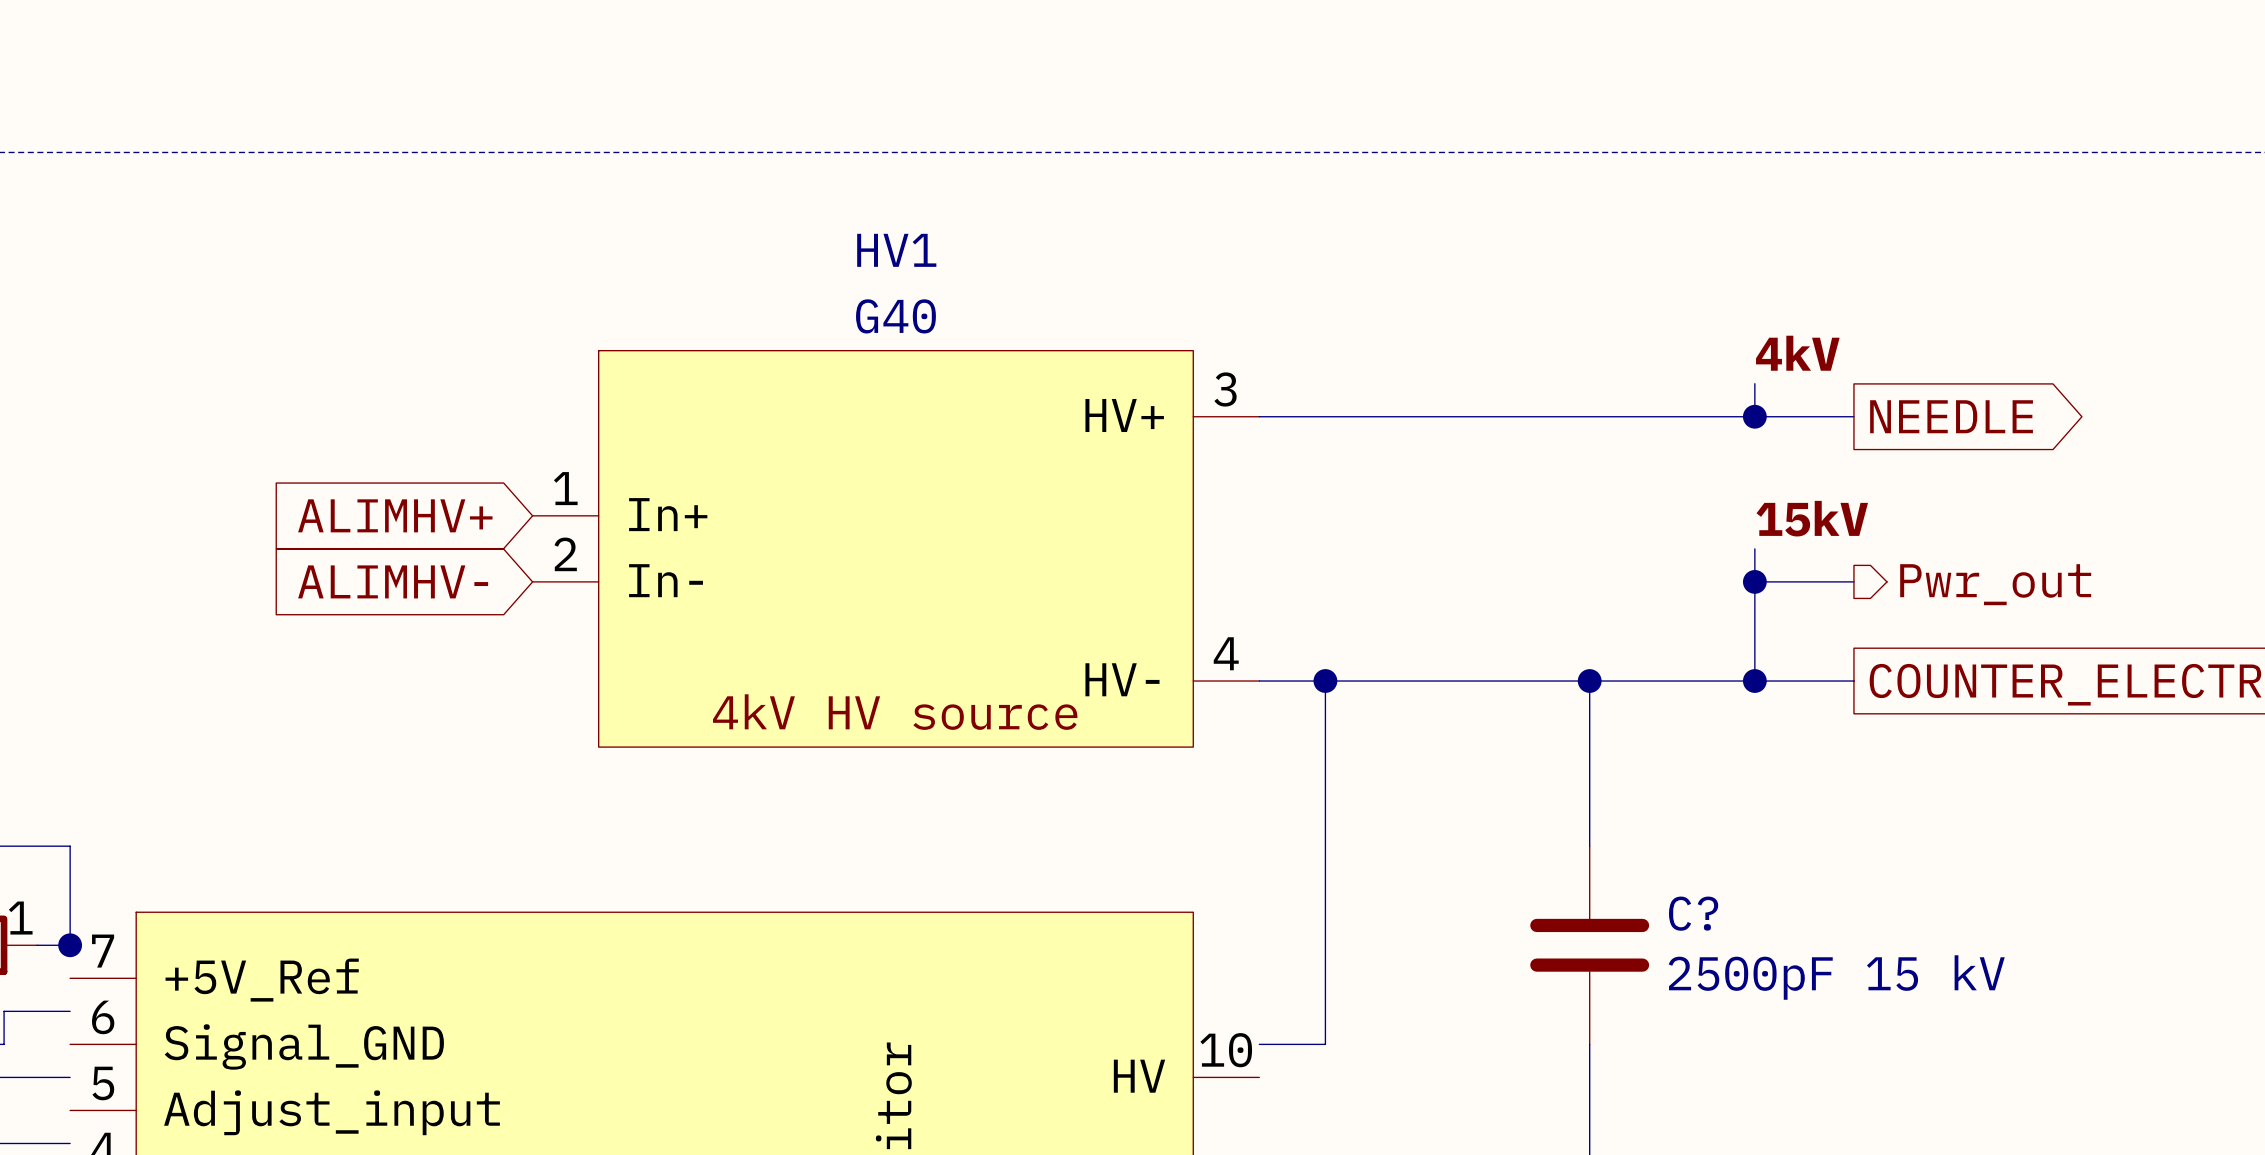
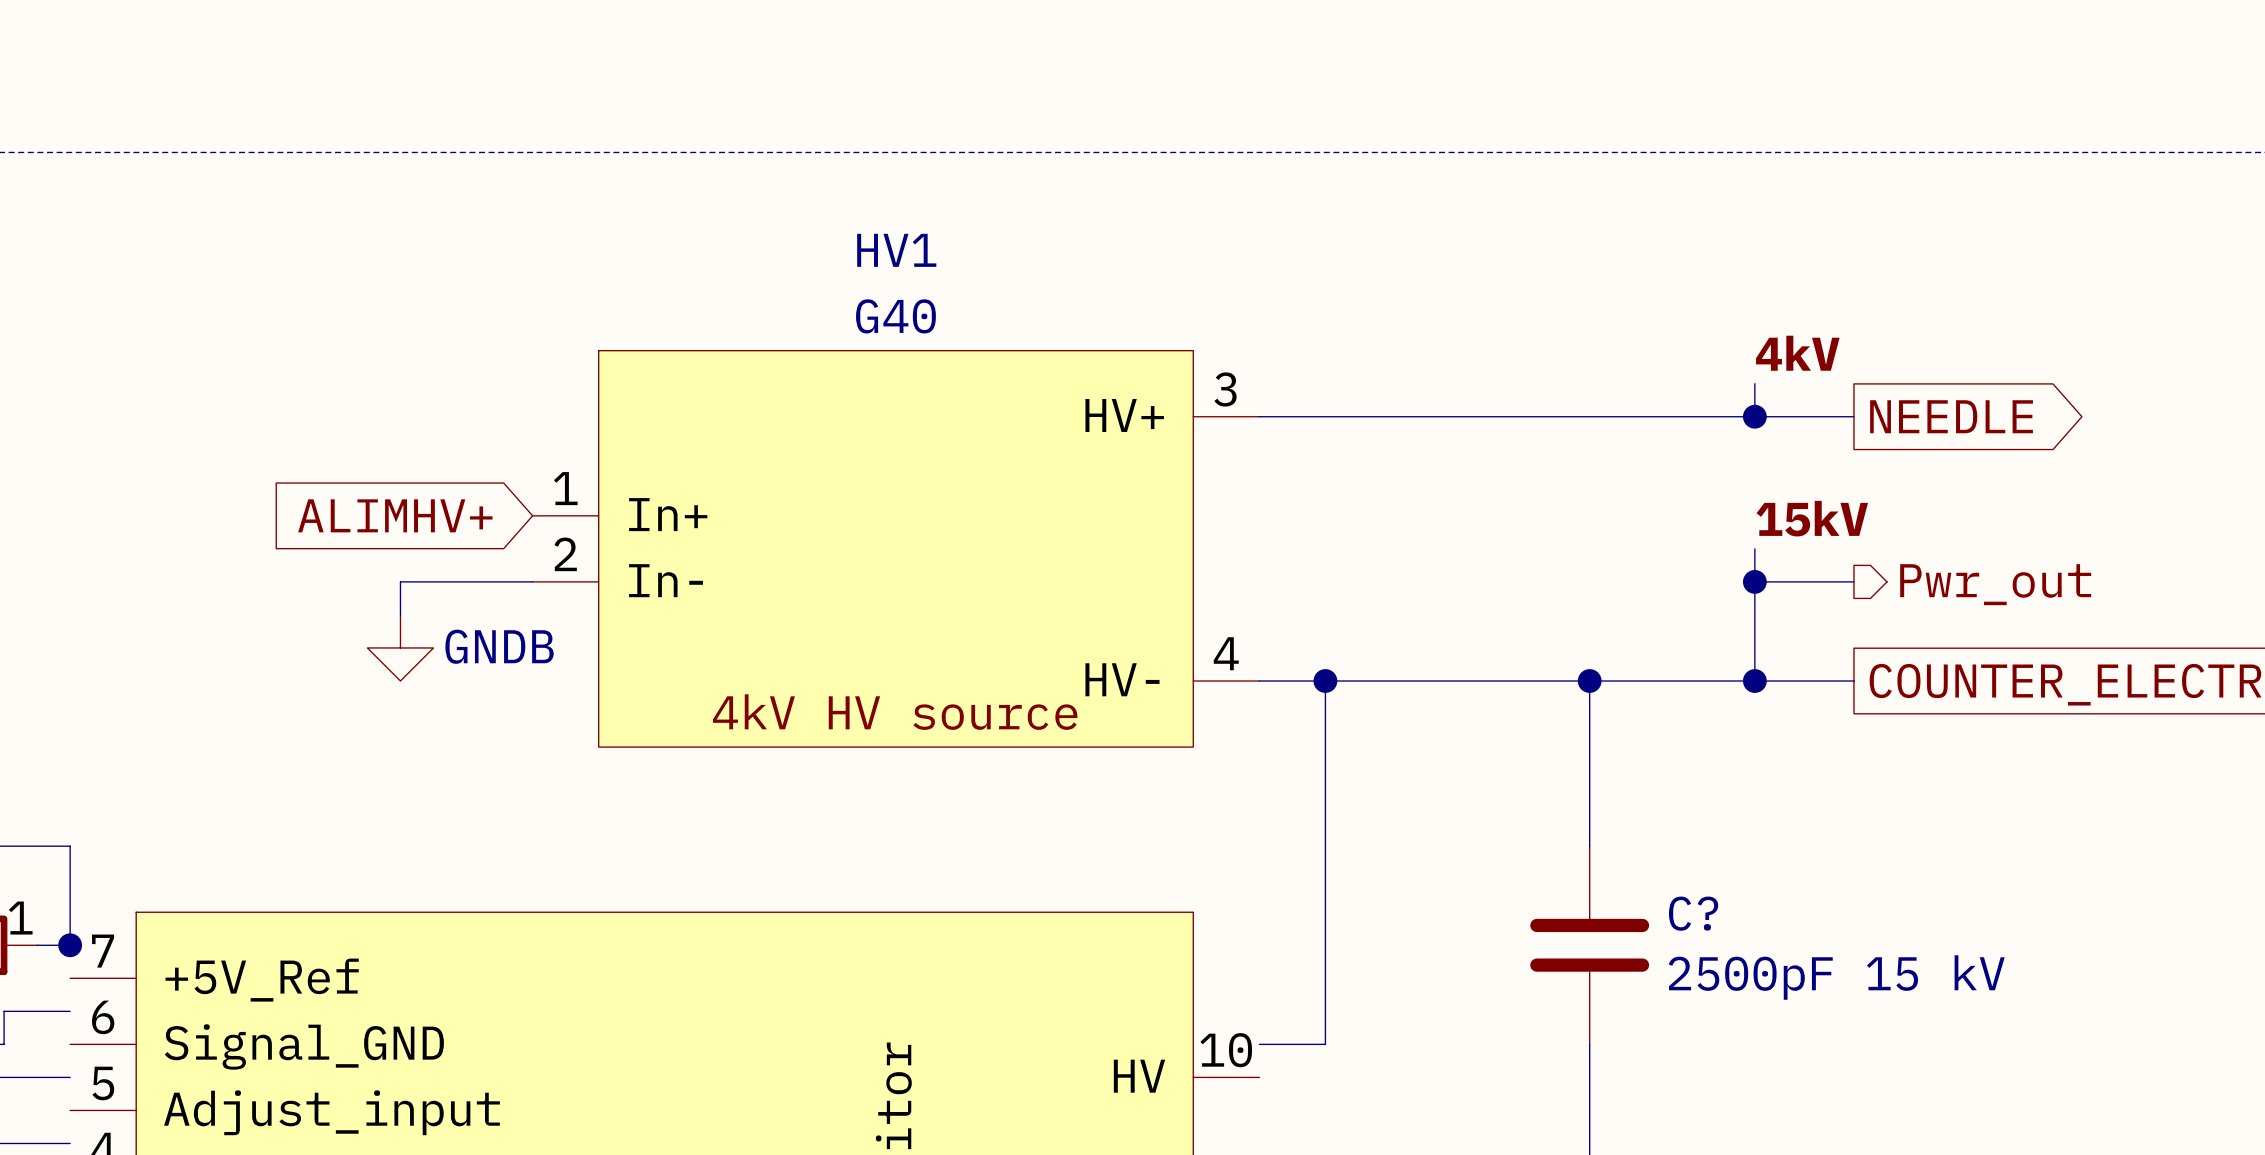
global label: ALIMHV- (393, 581) -> none
wire: none -> (532, 581) (400, 581) (400, 614)
power symbol: none -> GNDB (400, 647)

